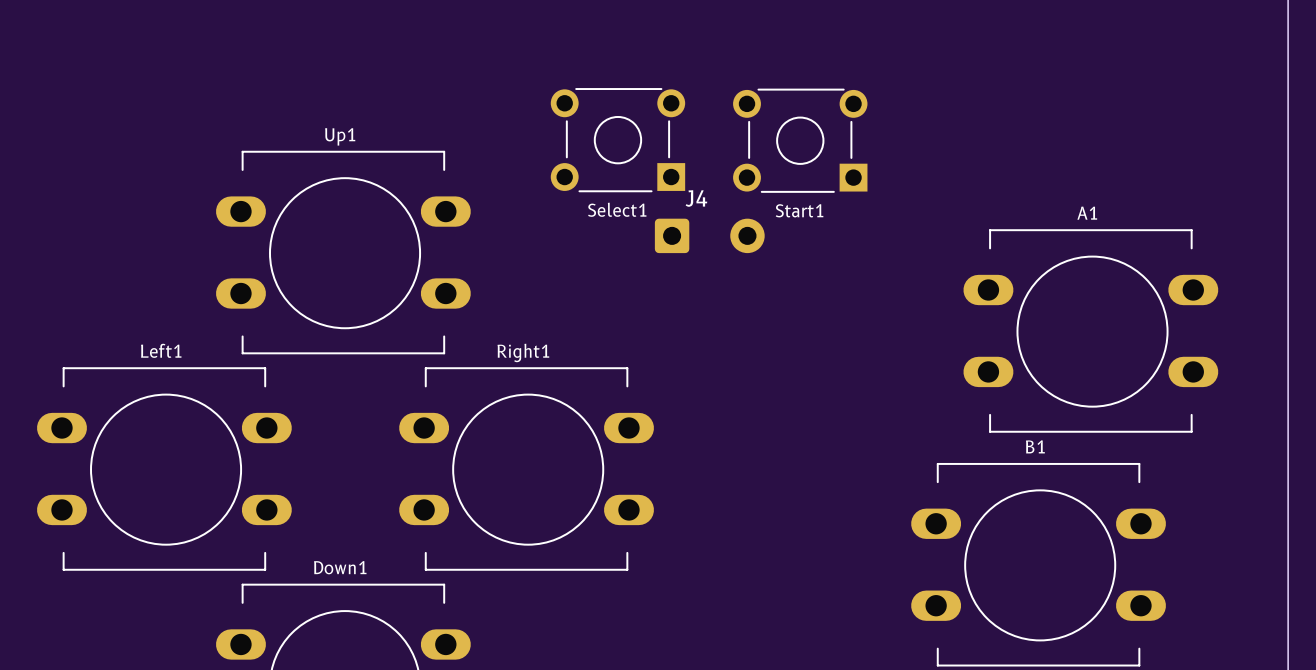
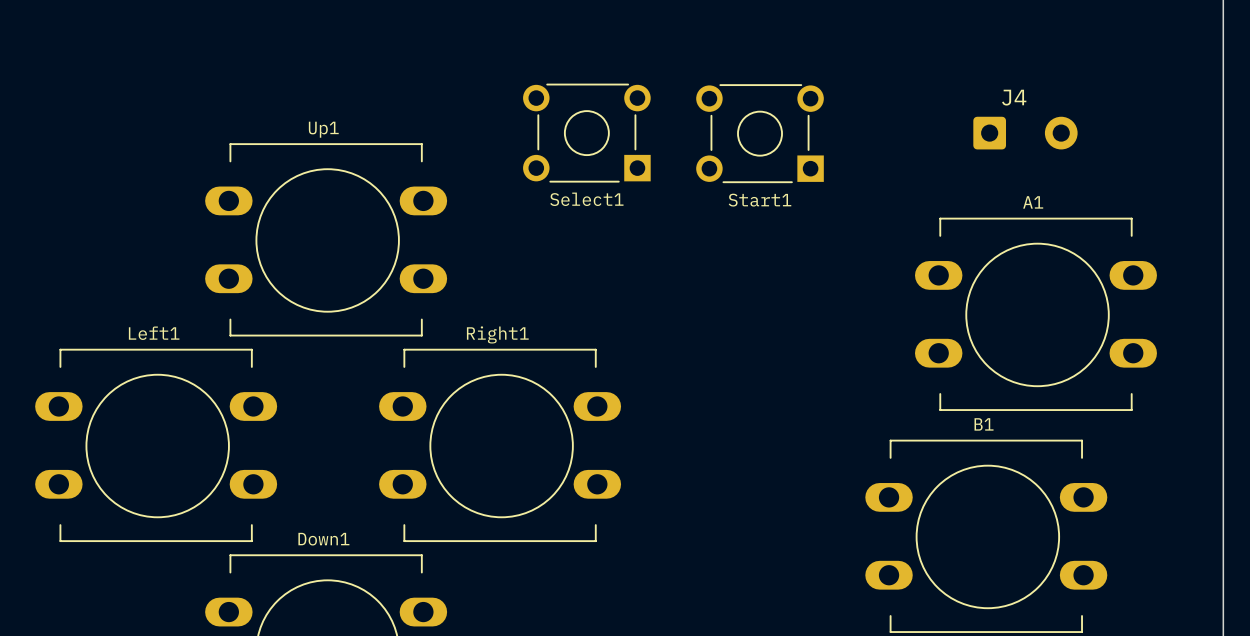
J4 position: (709, 235) -> (1025, 133)

